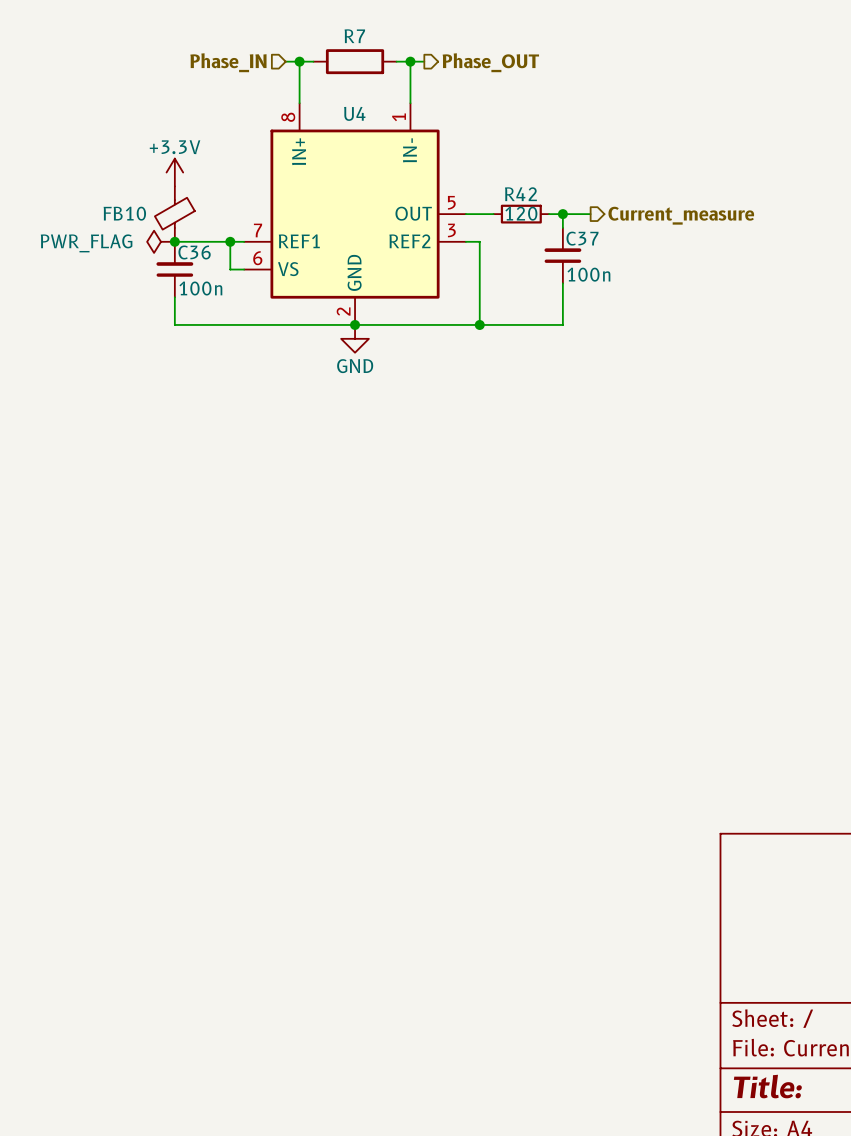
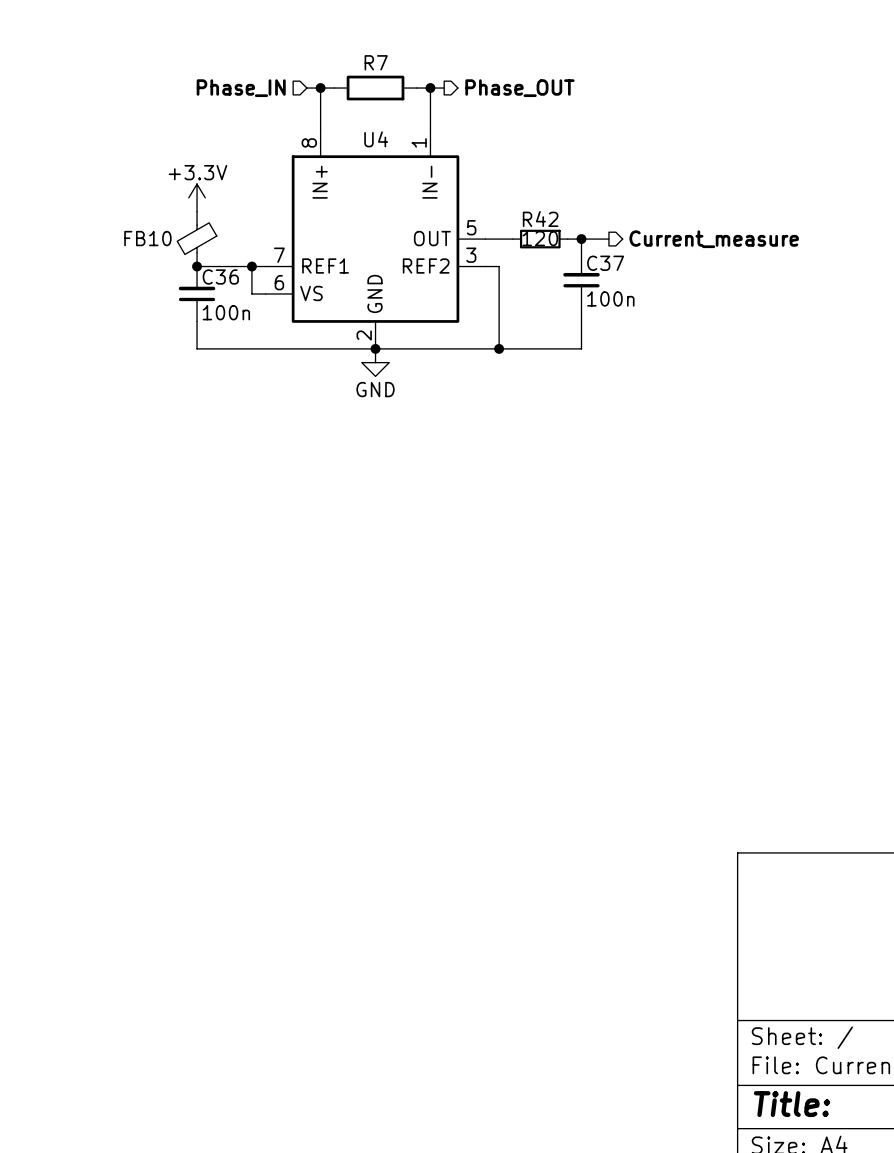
power symbol: PWR_FLAG (161, 241) -> none

